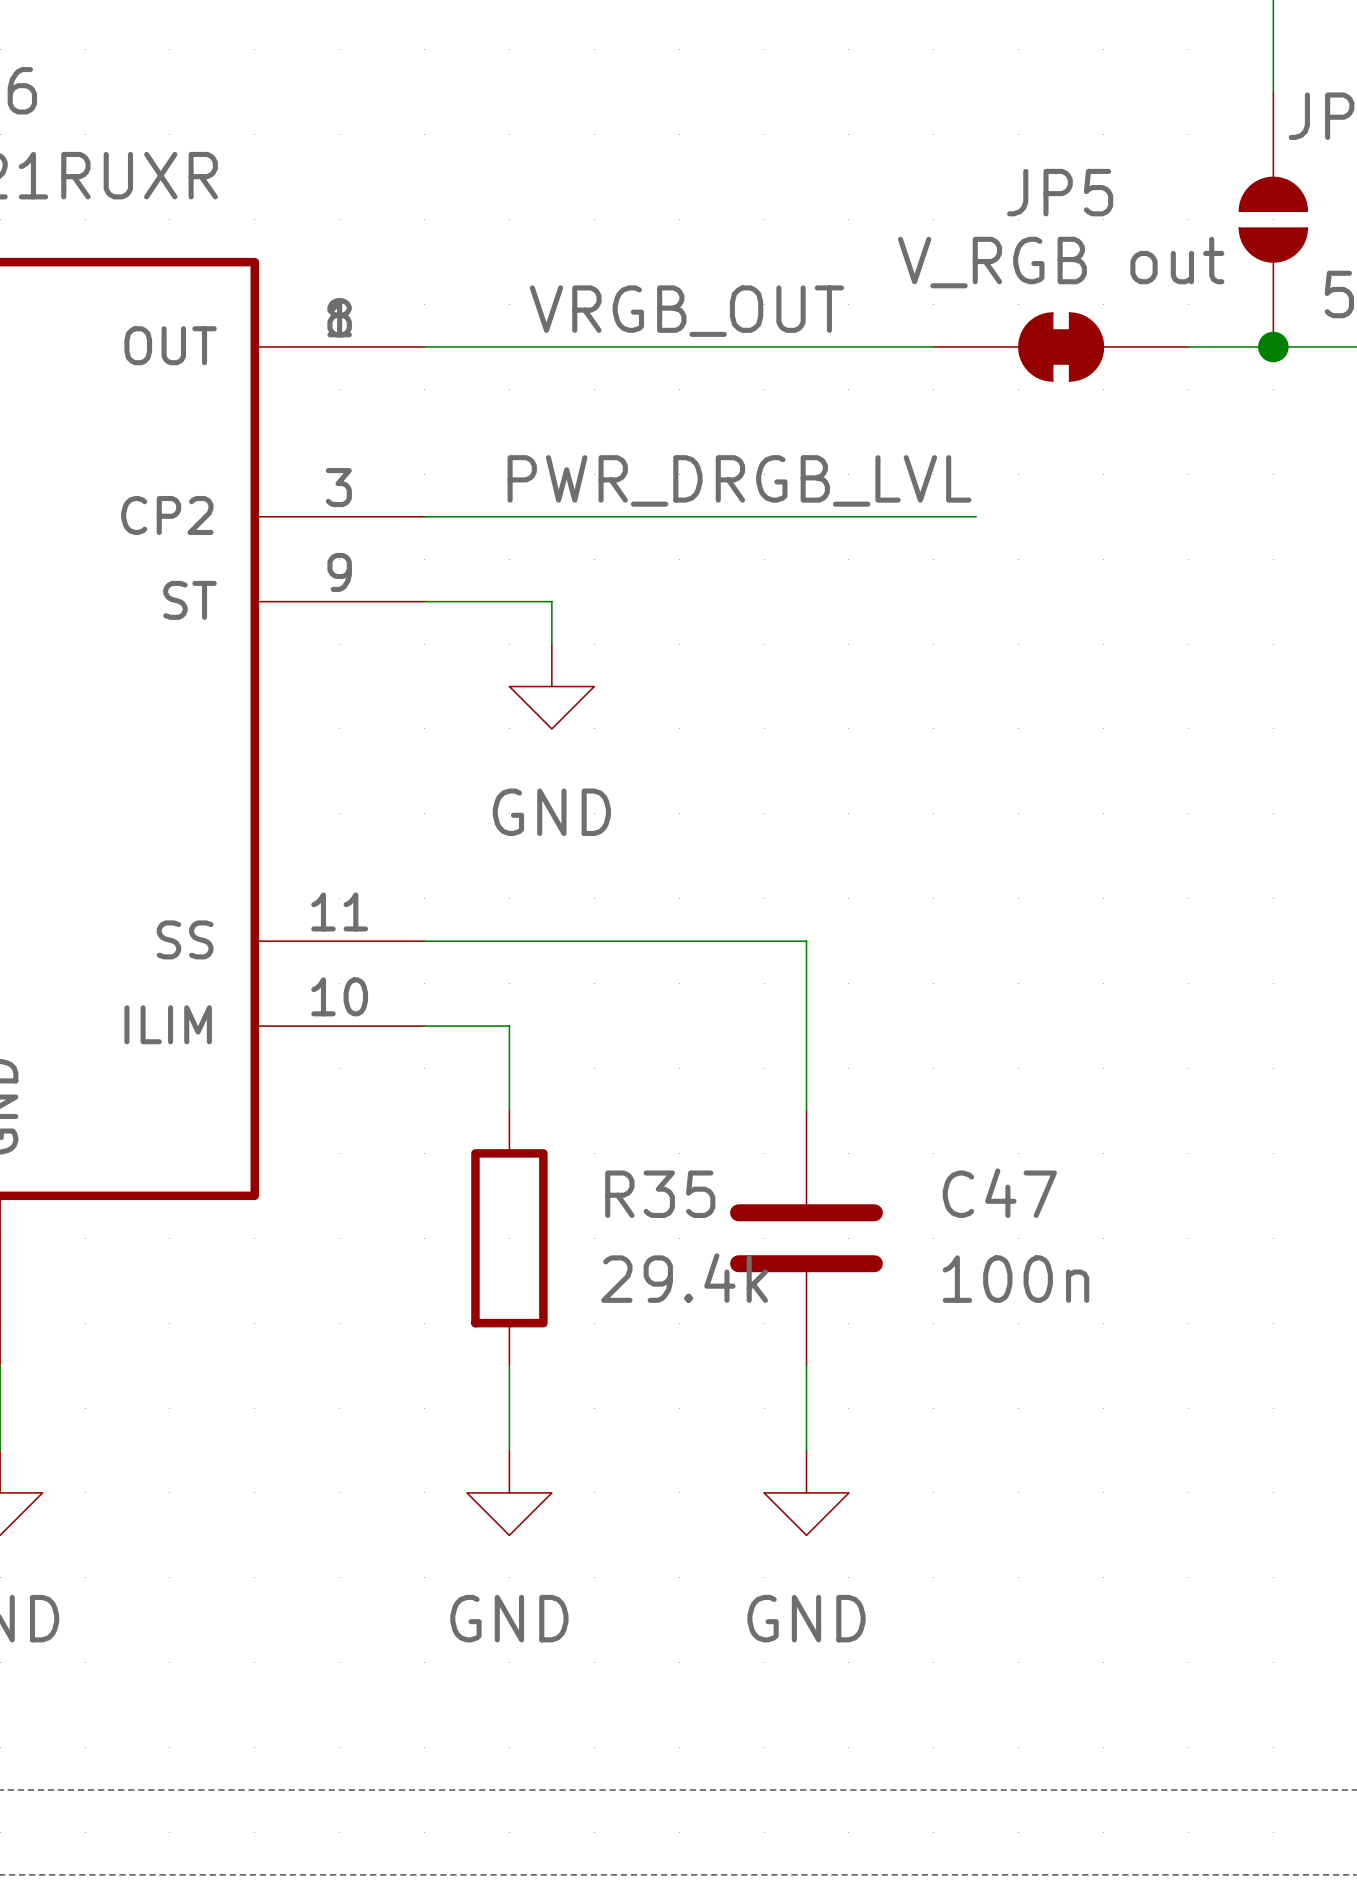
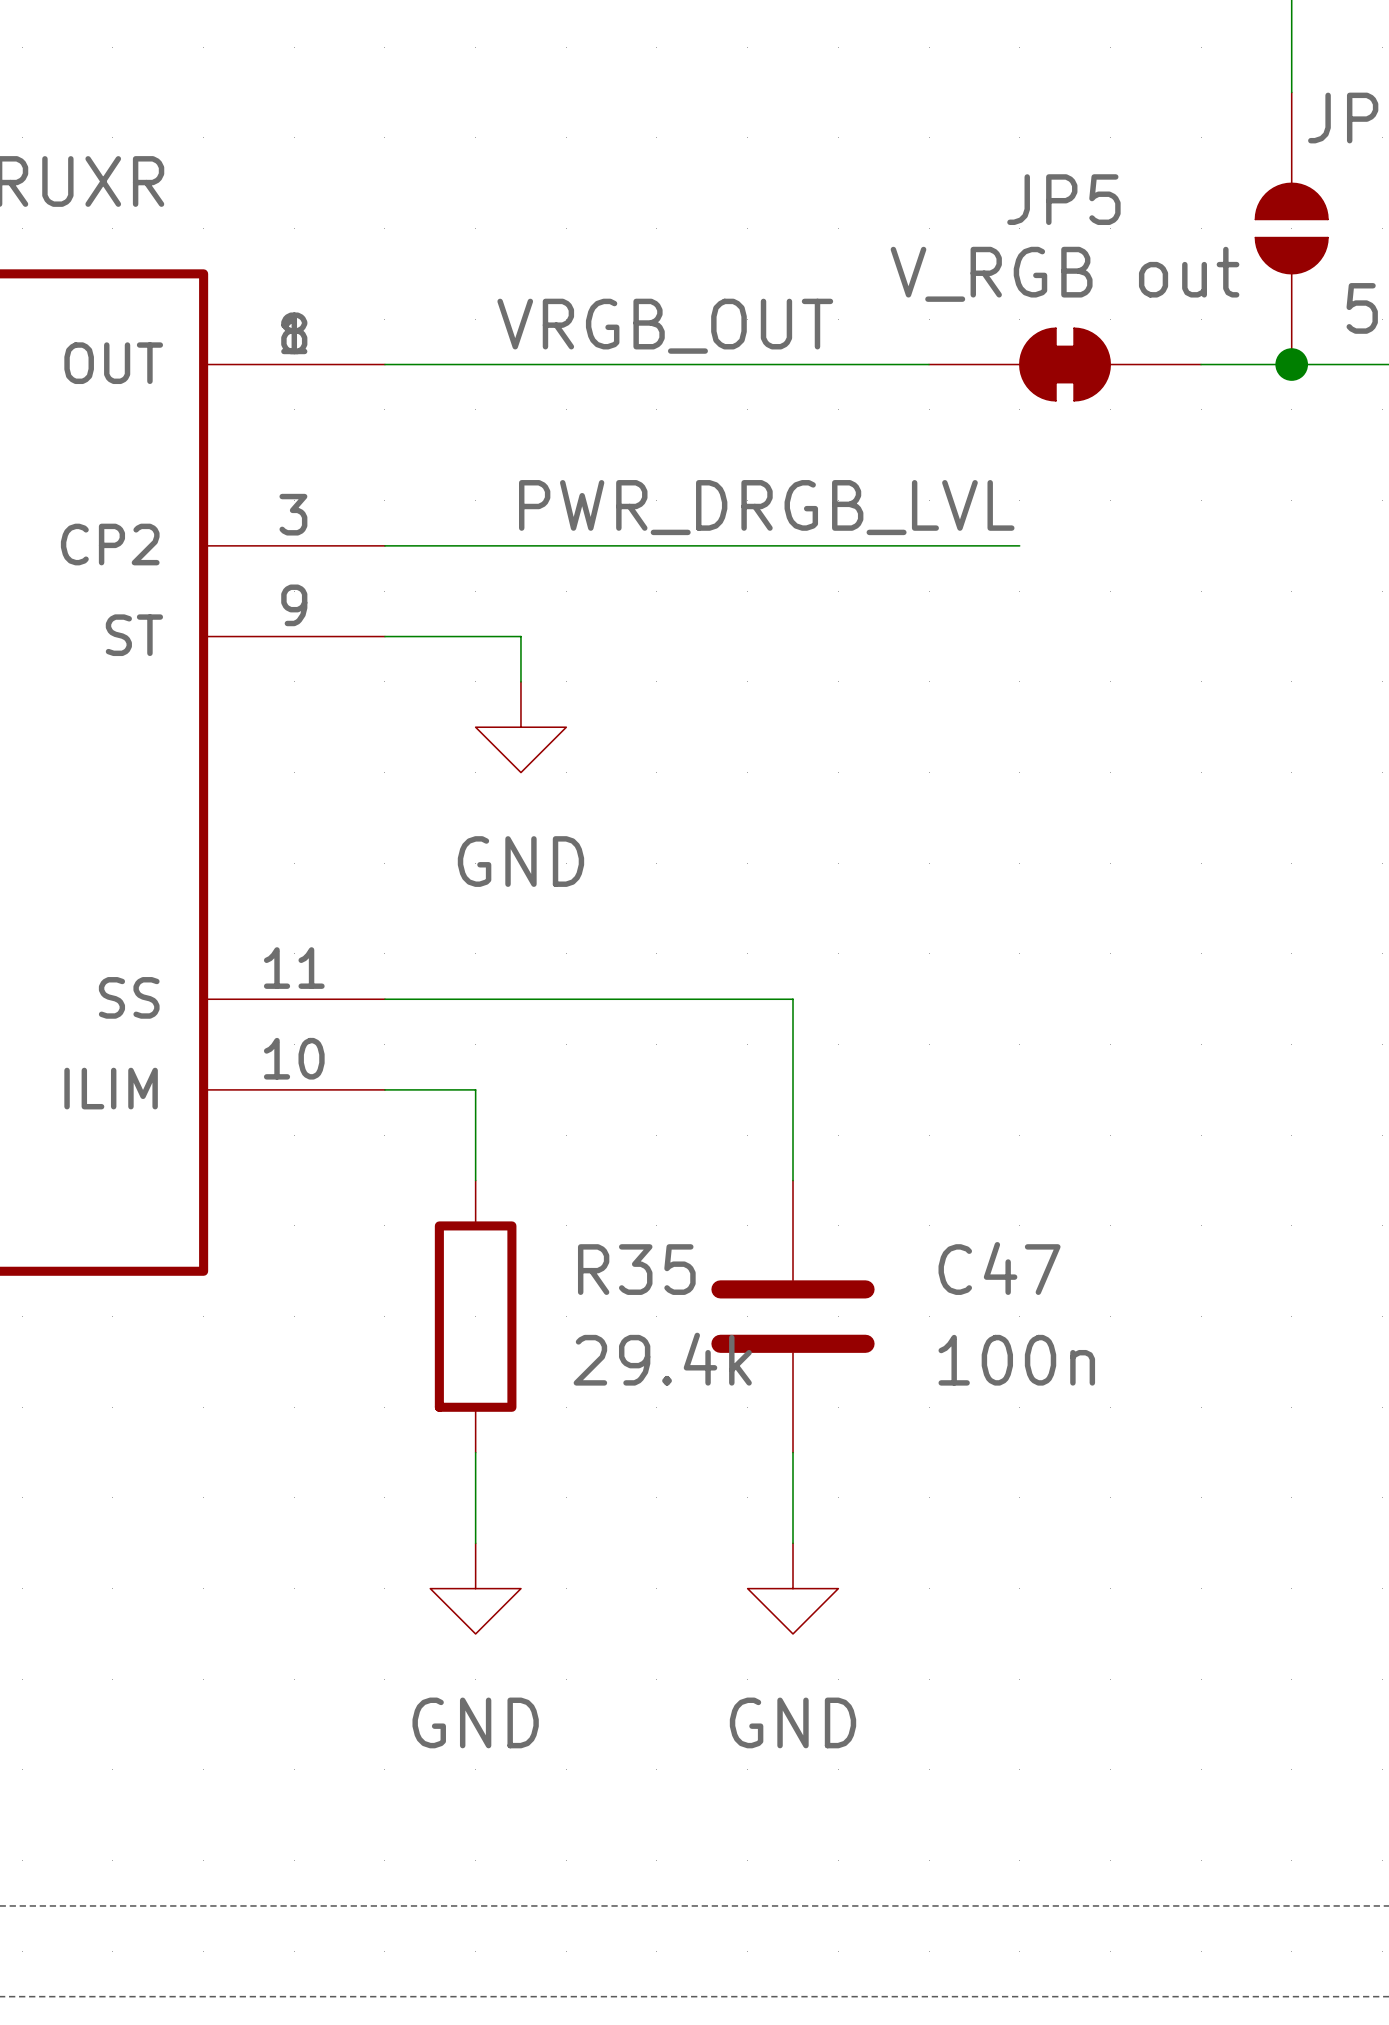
label position: PWR_DRGB_LVL (739, 480) -> PWR_DRGB_LVL (766, 507)
wire: none -> (974, 545) (1019, 545)

